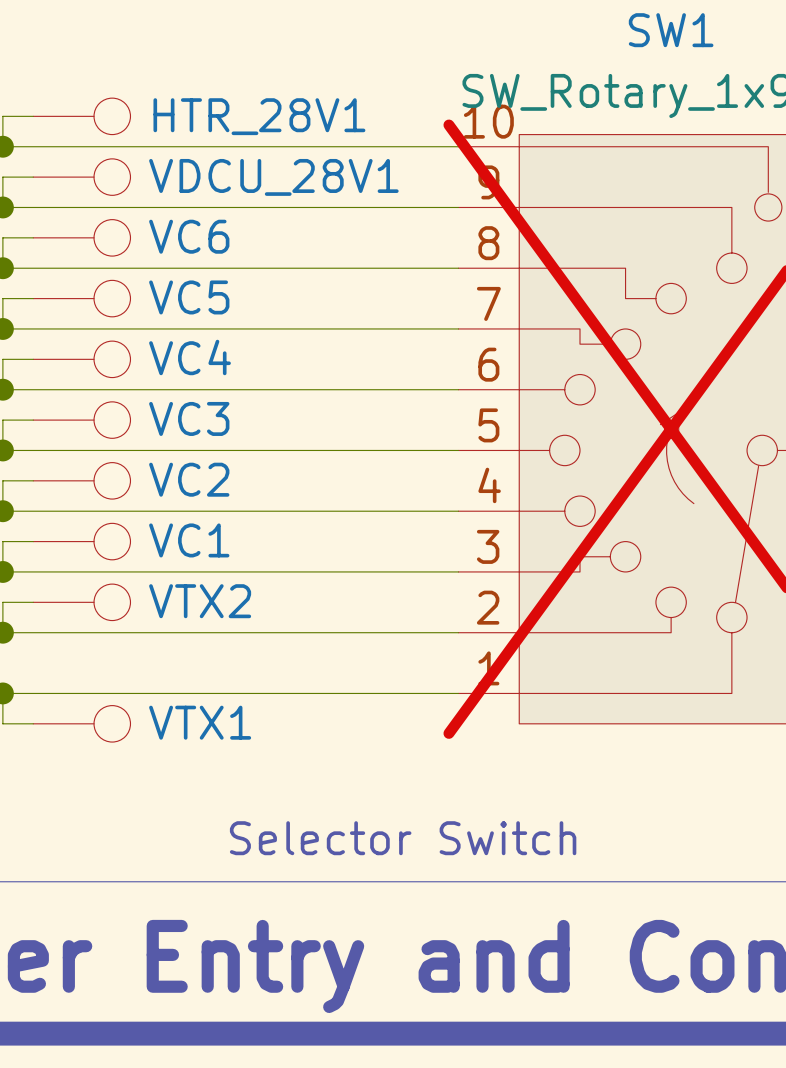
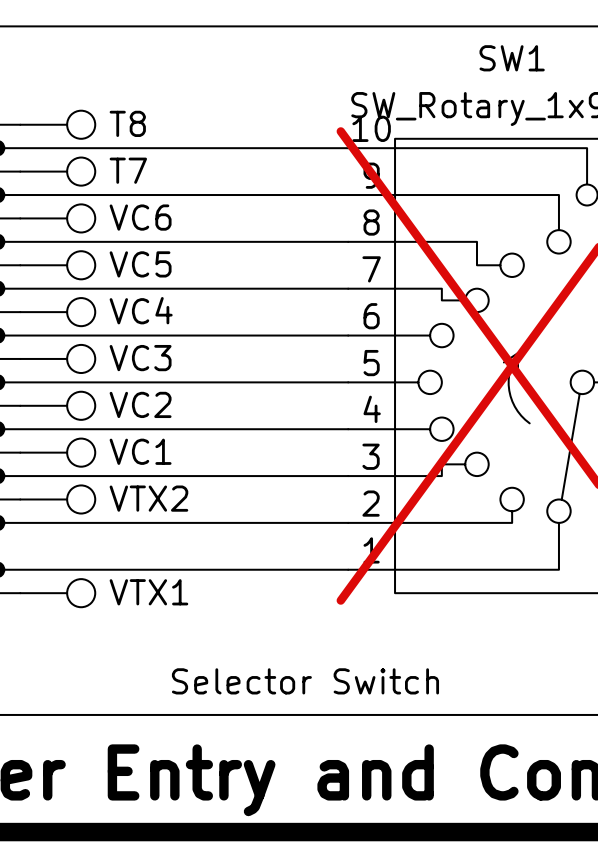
HTR_28V1 name: HTR_28V1 (259, 116) -> T8 (127, 123)
VDCU_28V1 name: VDCU_28V1 (273, 177) -> T7 (128, 170)

